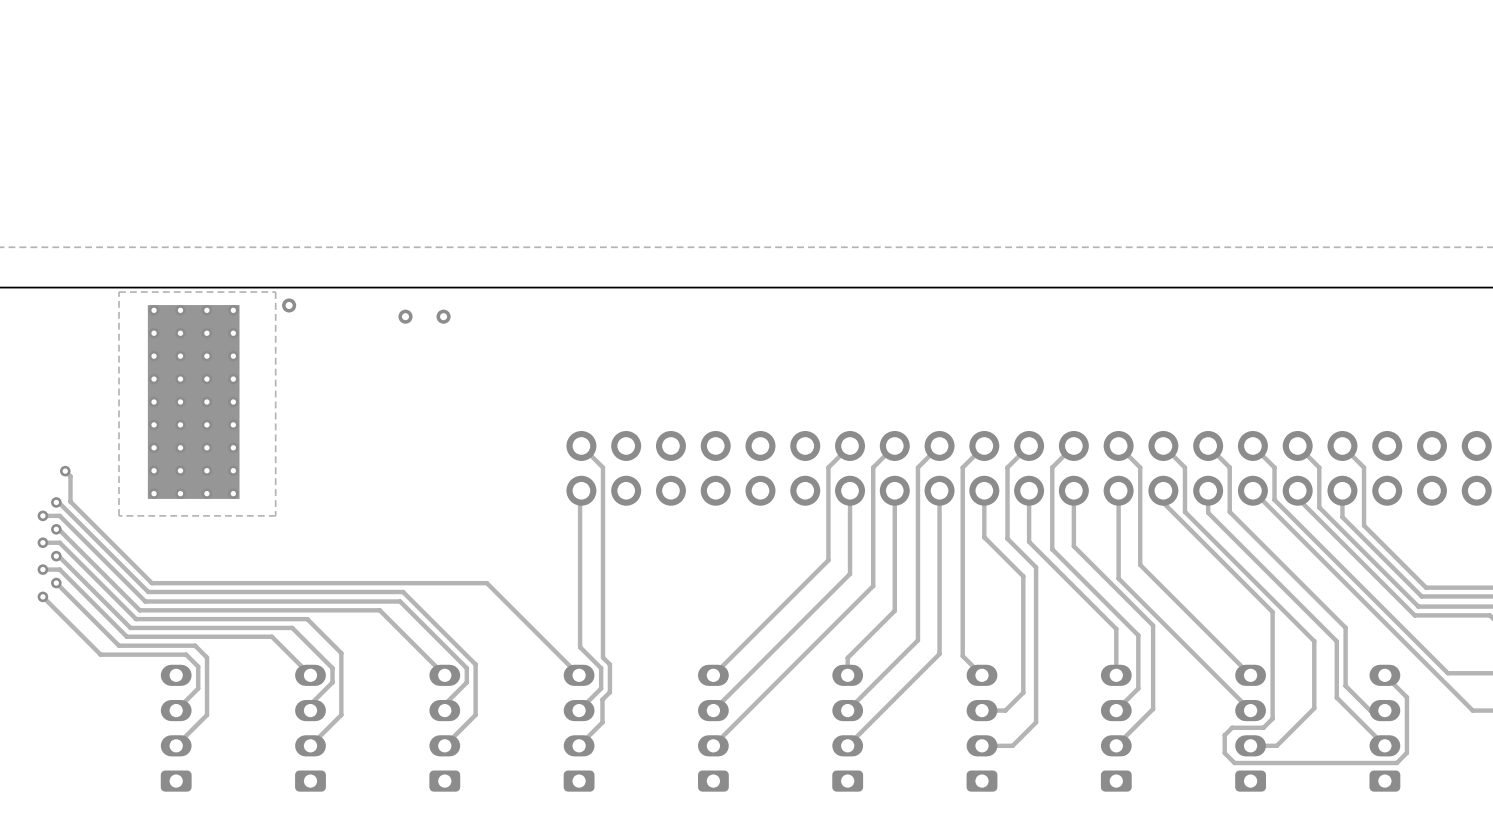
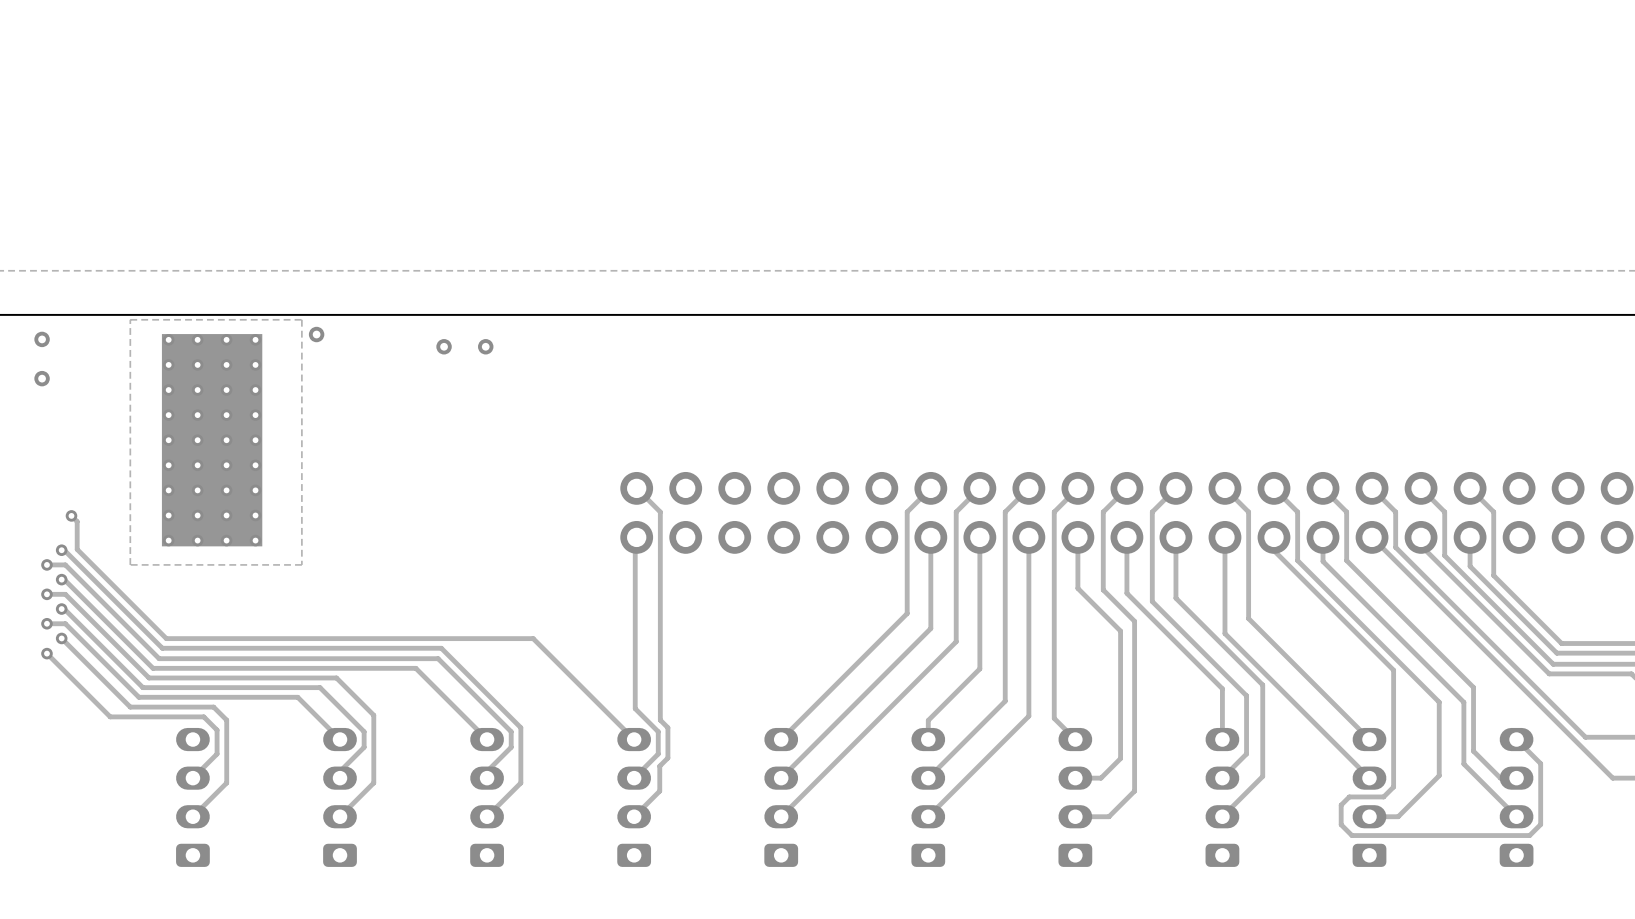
via: none -> (42, 339)
via: none -> (42, 378)

